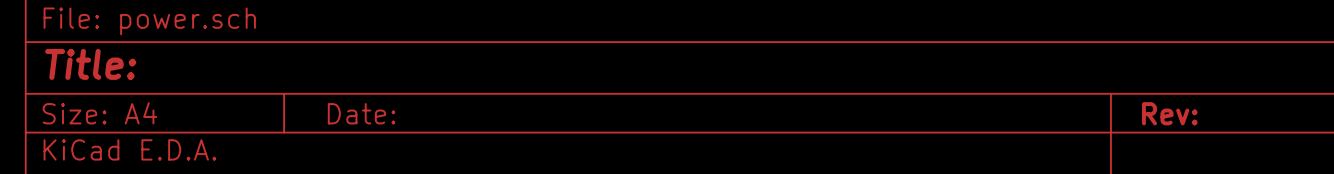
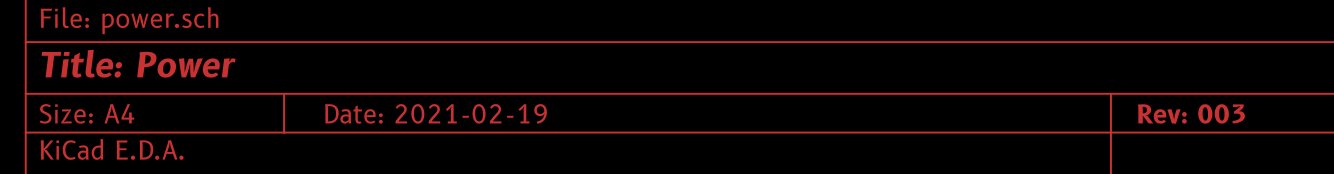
title block: Title: (90, 64) -> Title: Power (138, 63)
title block: Date: (361, 113) -> Date: 2021-02-19 (435, 113)
title block: Rev: (1169, 113) -> Rev: 003 (1191, 113)

